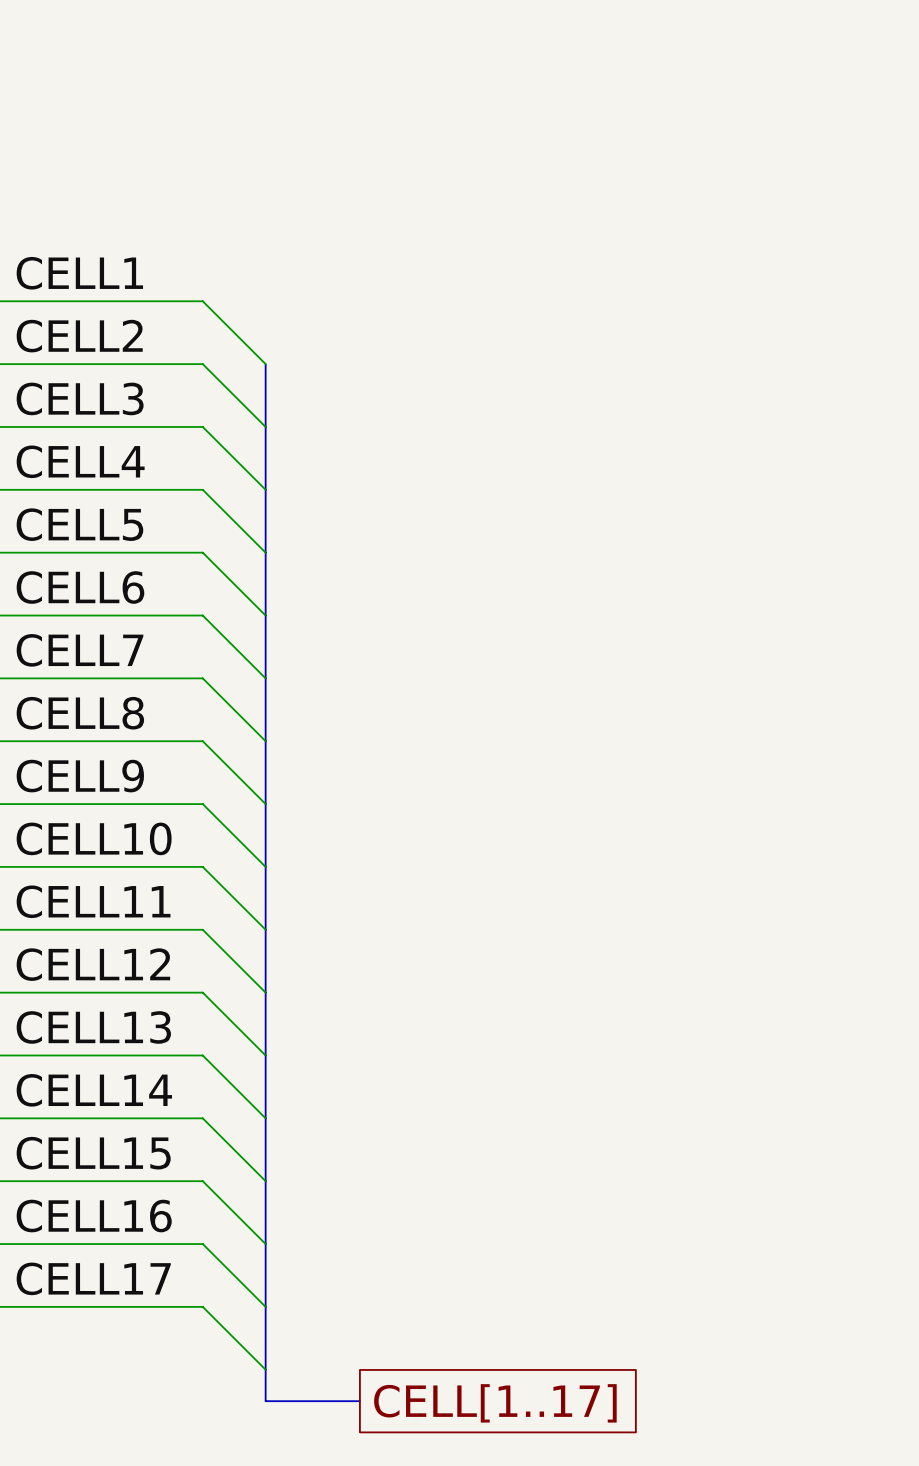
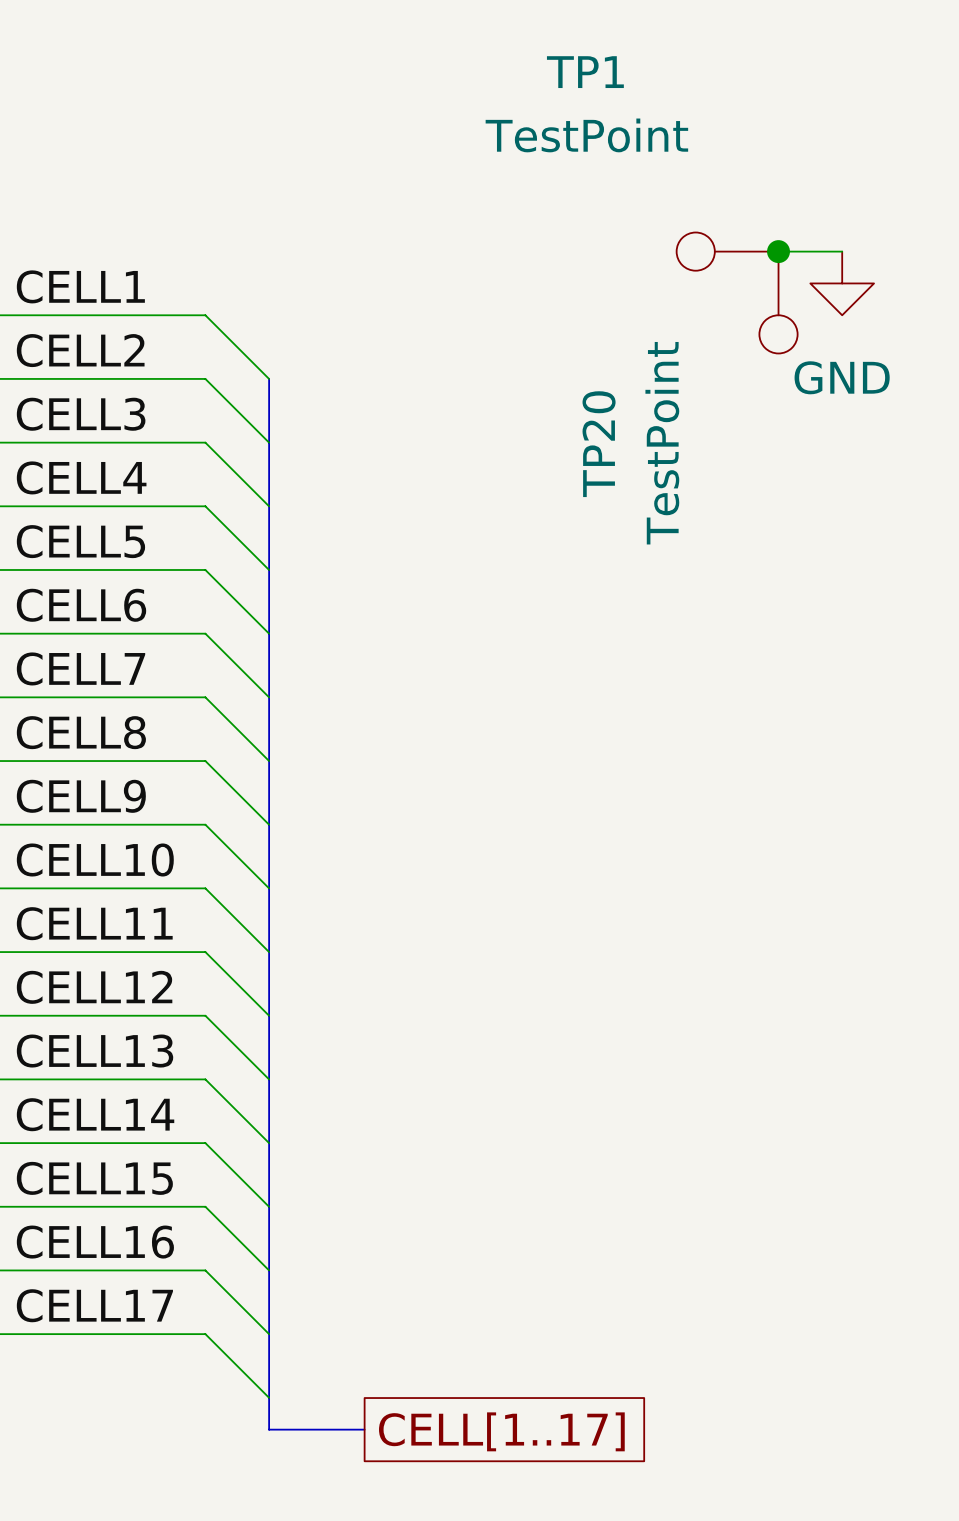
TP1: none -> TestPoint (727, 251)
wire: none -> (778, 251) (842, 251)
junction: none -> (778, 251)
power symbol: none -> GND (842, 283)
TP20: none -> TestPoint (778, 302)

